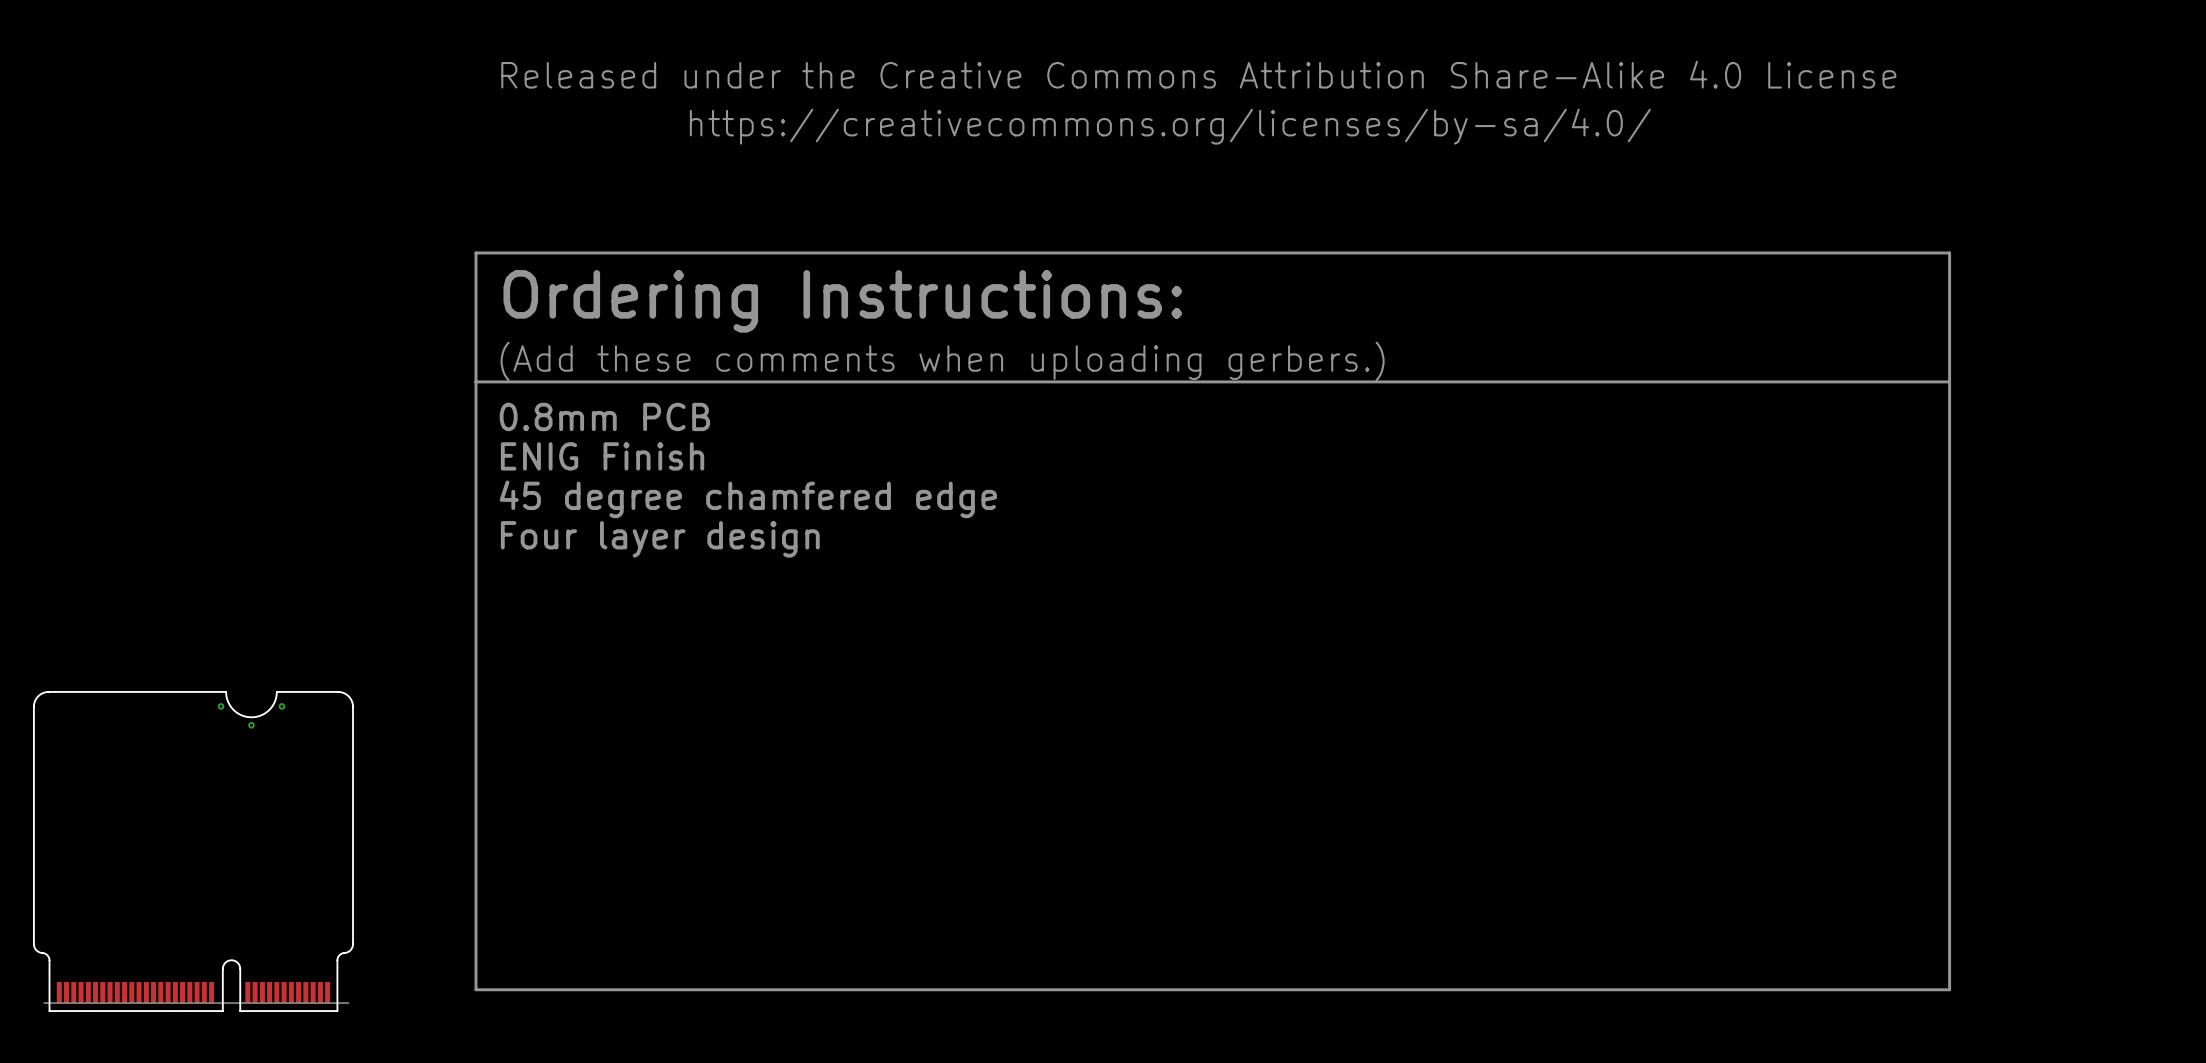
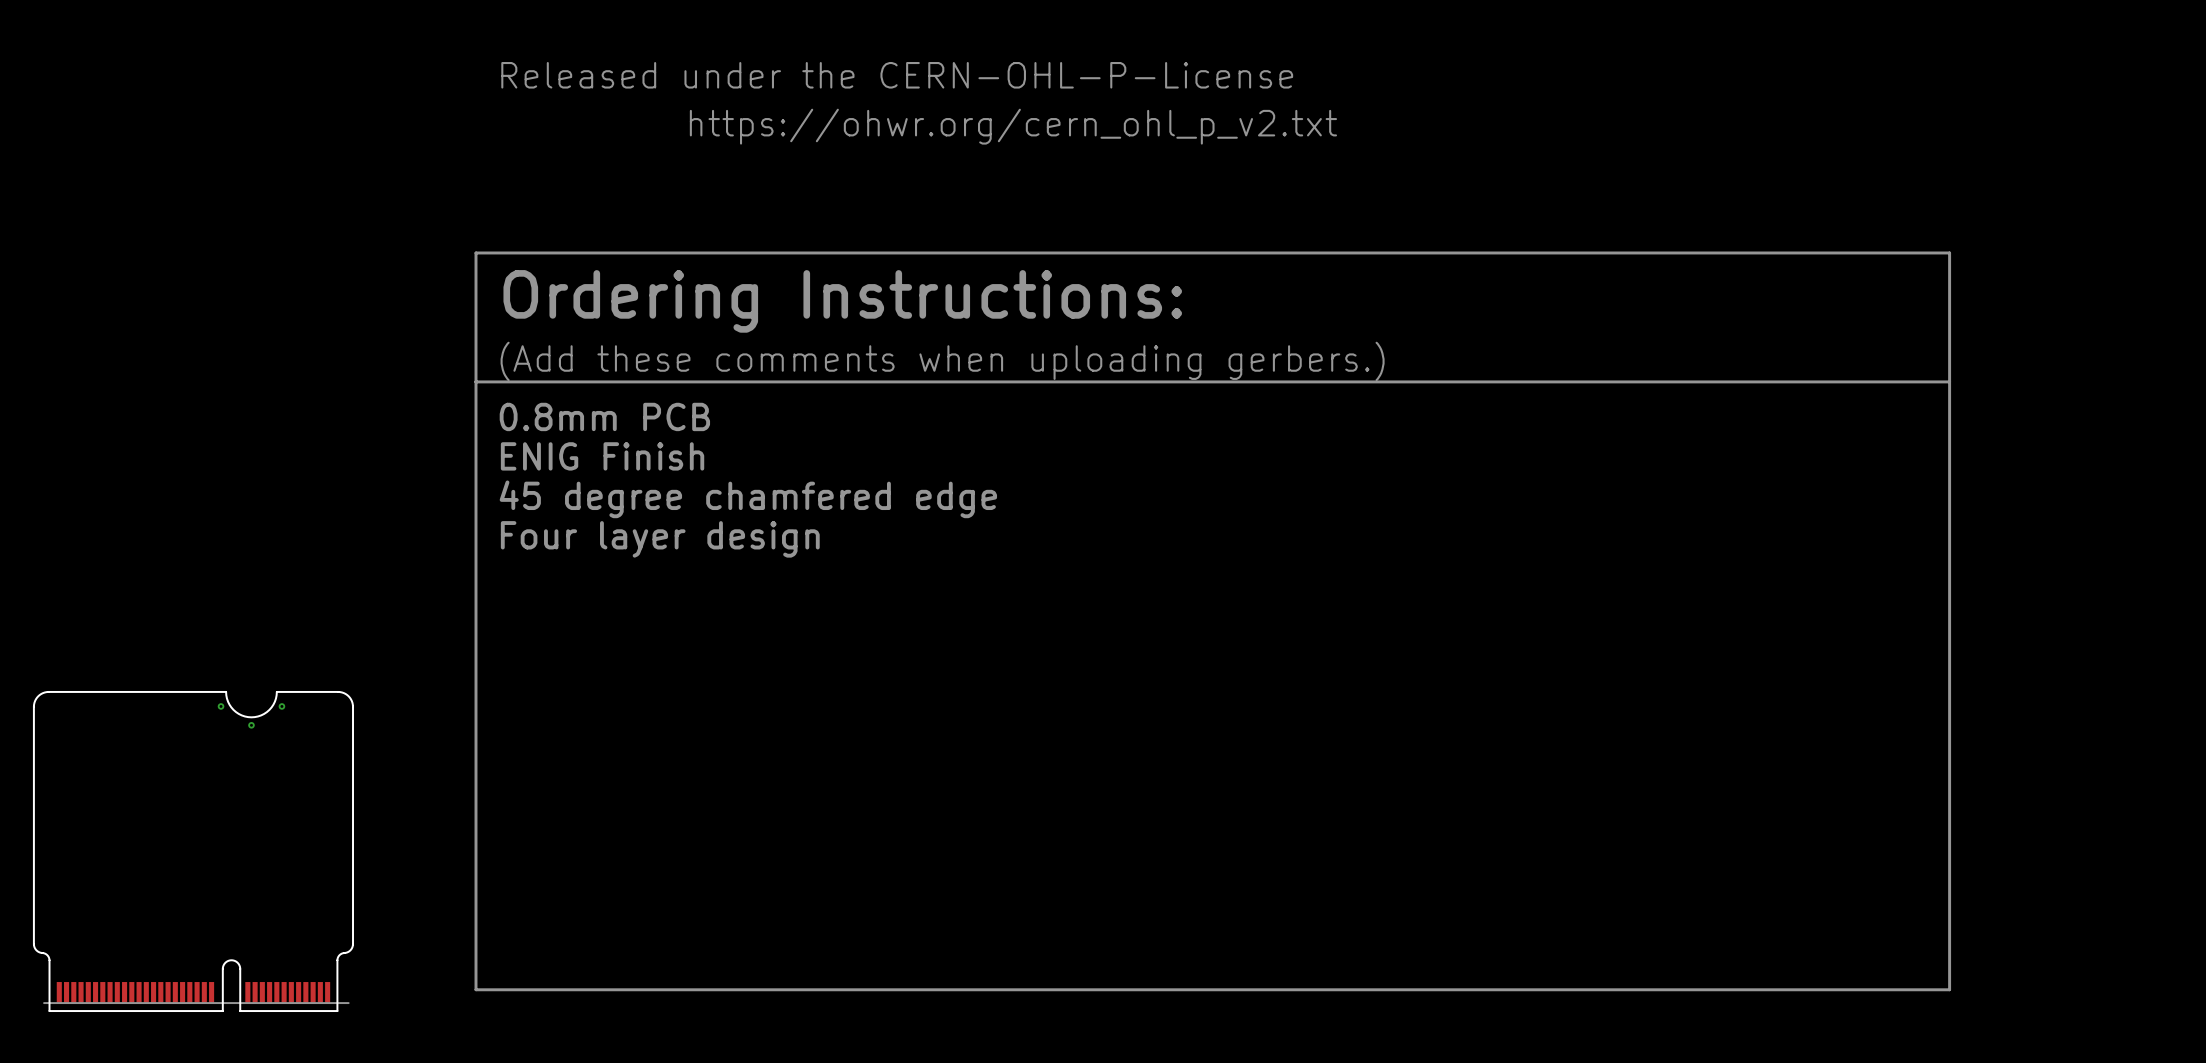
drawing: [501, 60, 1897, 145] -> none
drawing: none -> [501, 62, 1338, 145]

